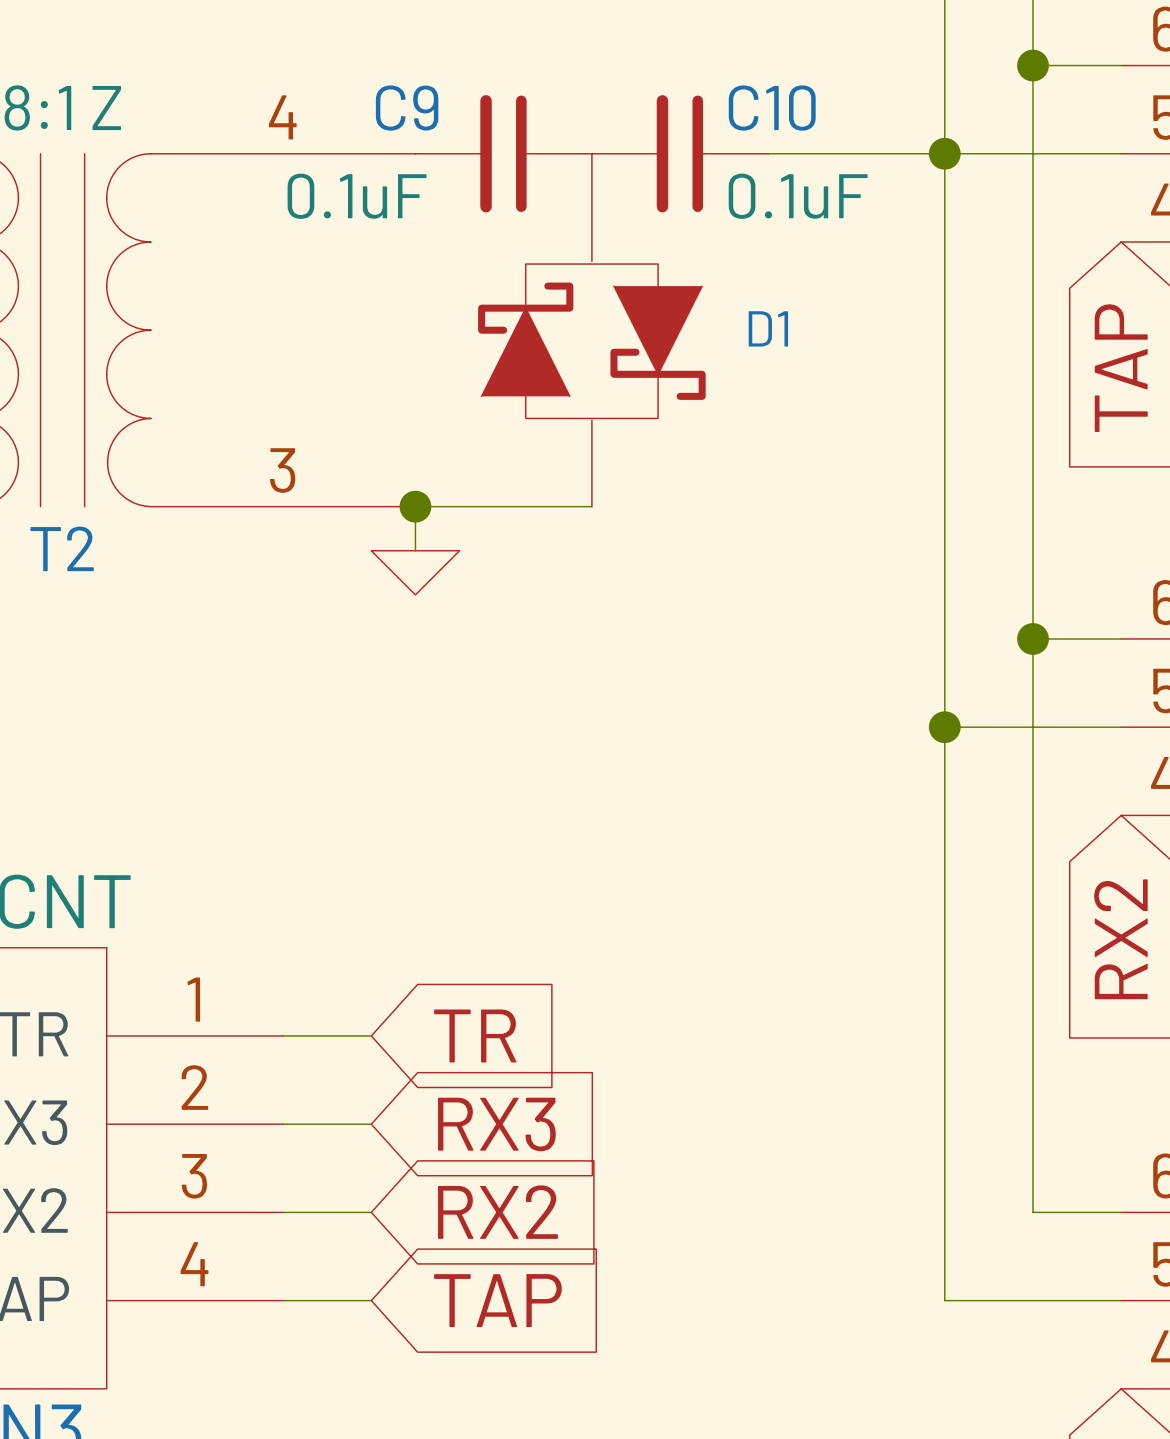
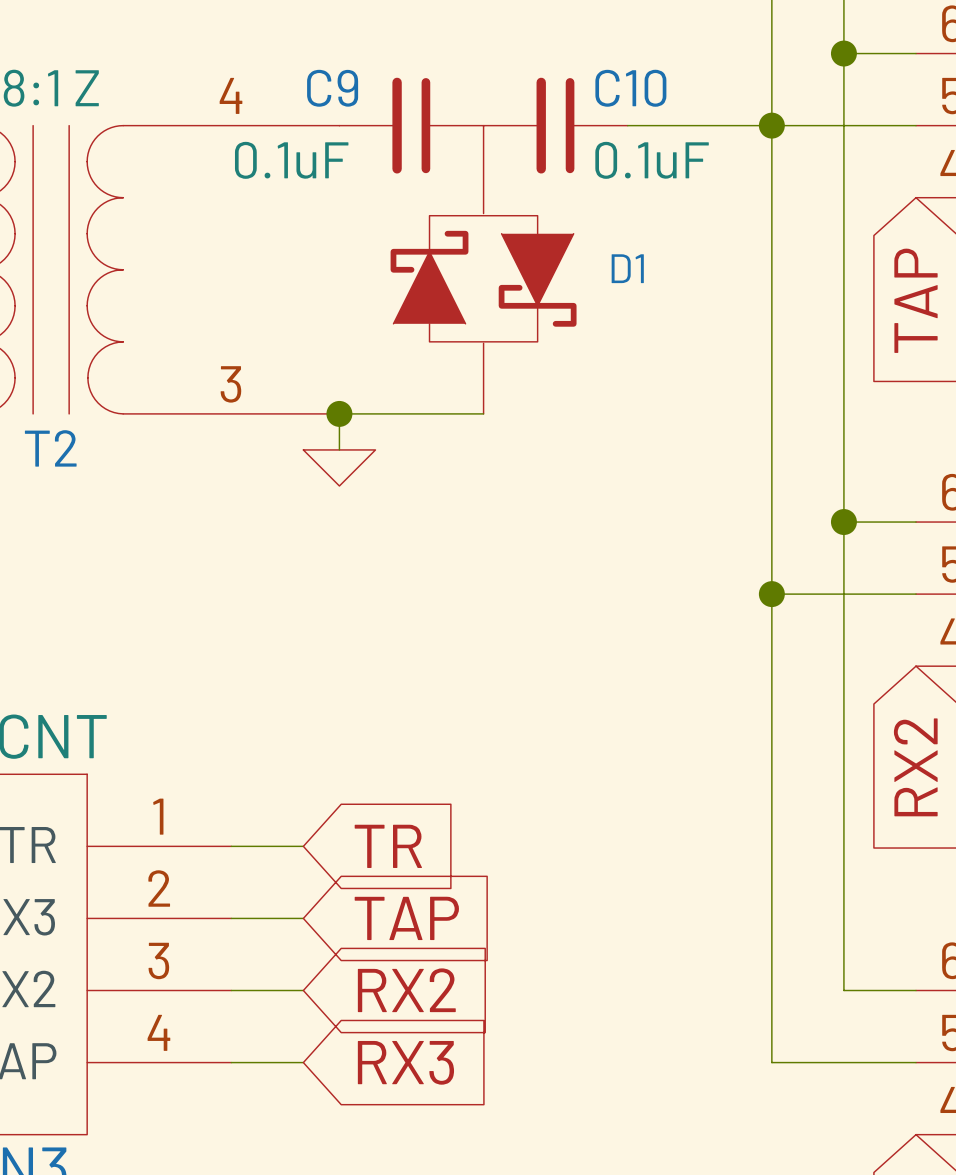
global label: RX3 (496, 1124) -> TAP (406, 918)
global label: TAP (497, 1300) -> RX3 (405, 1062)

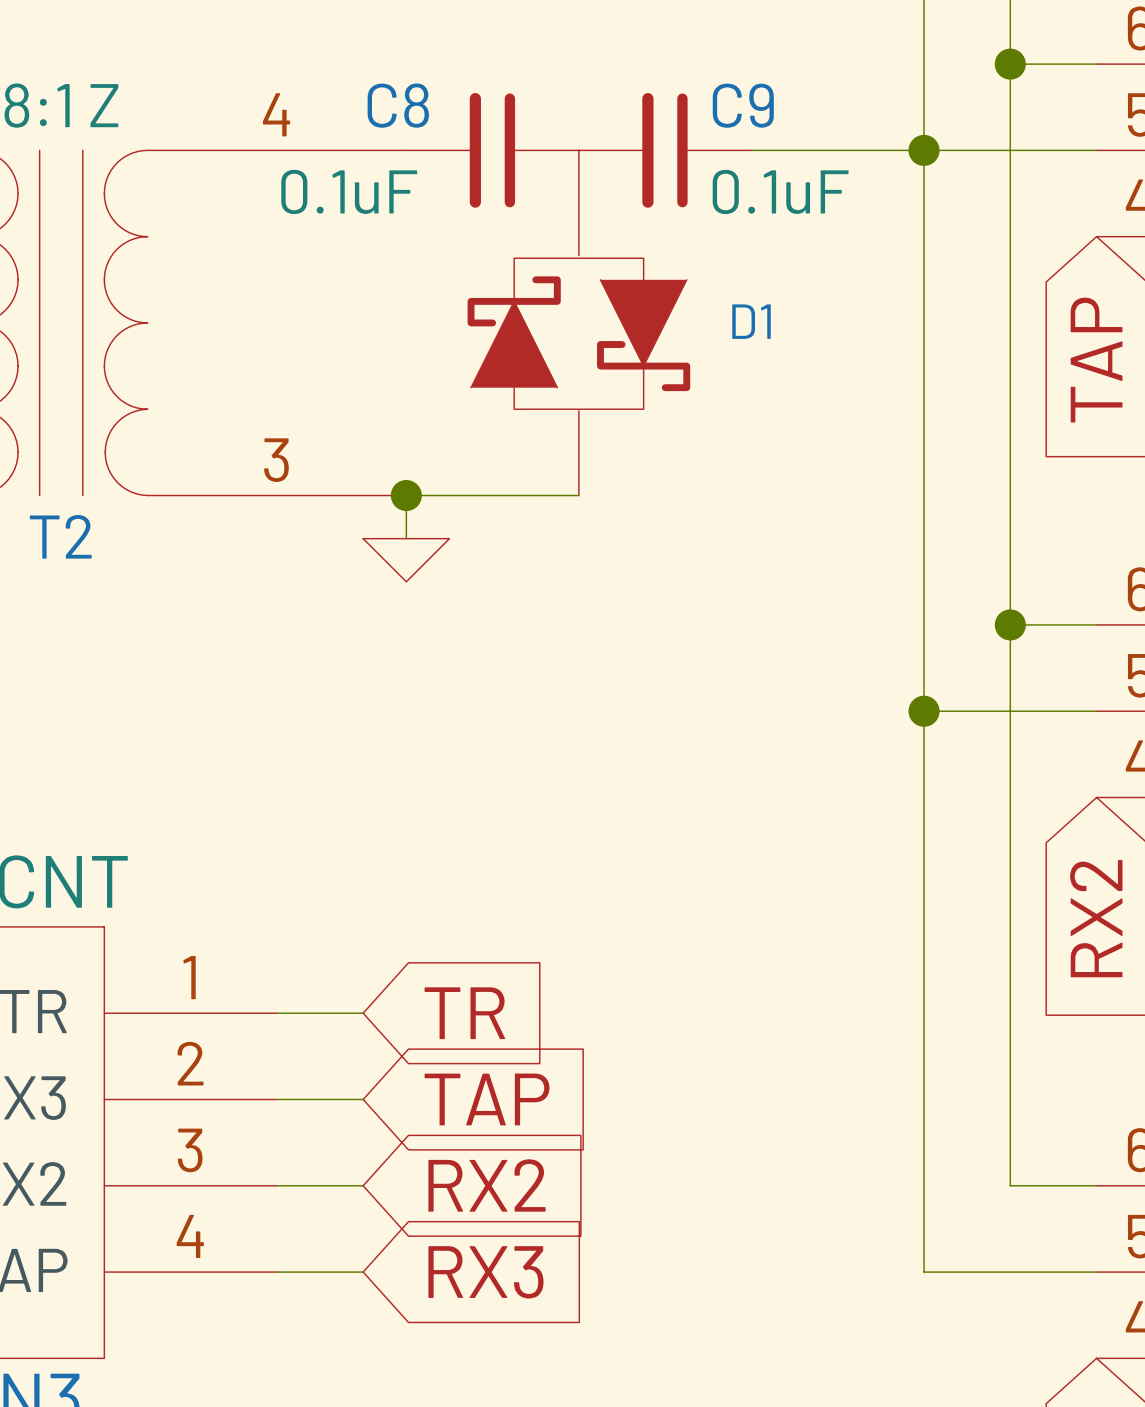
C9 name: C9 (332, 88) -> C8 (398, 105)
C10 name: C10 (630, 88) -> C9 (743, 105)

